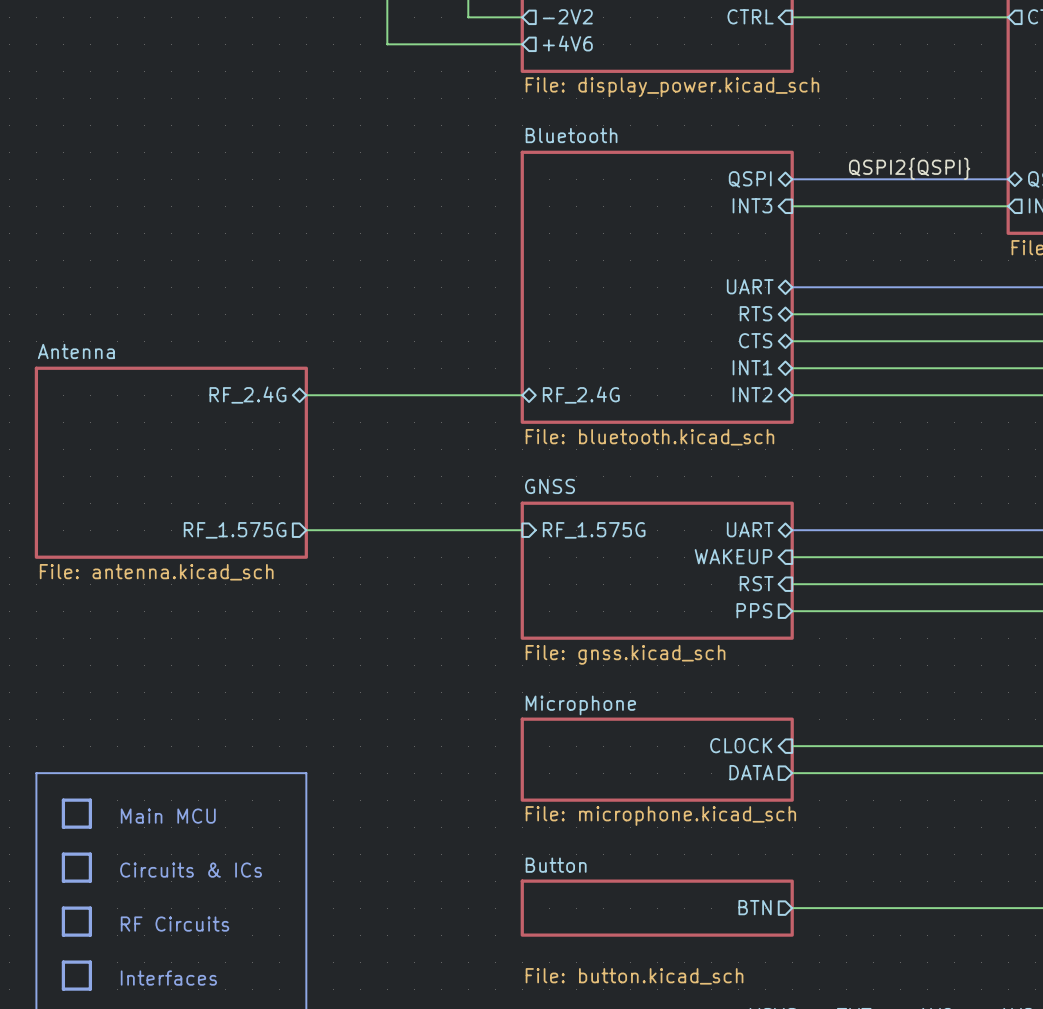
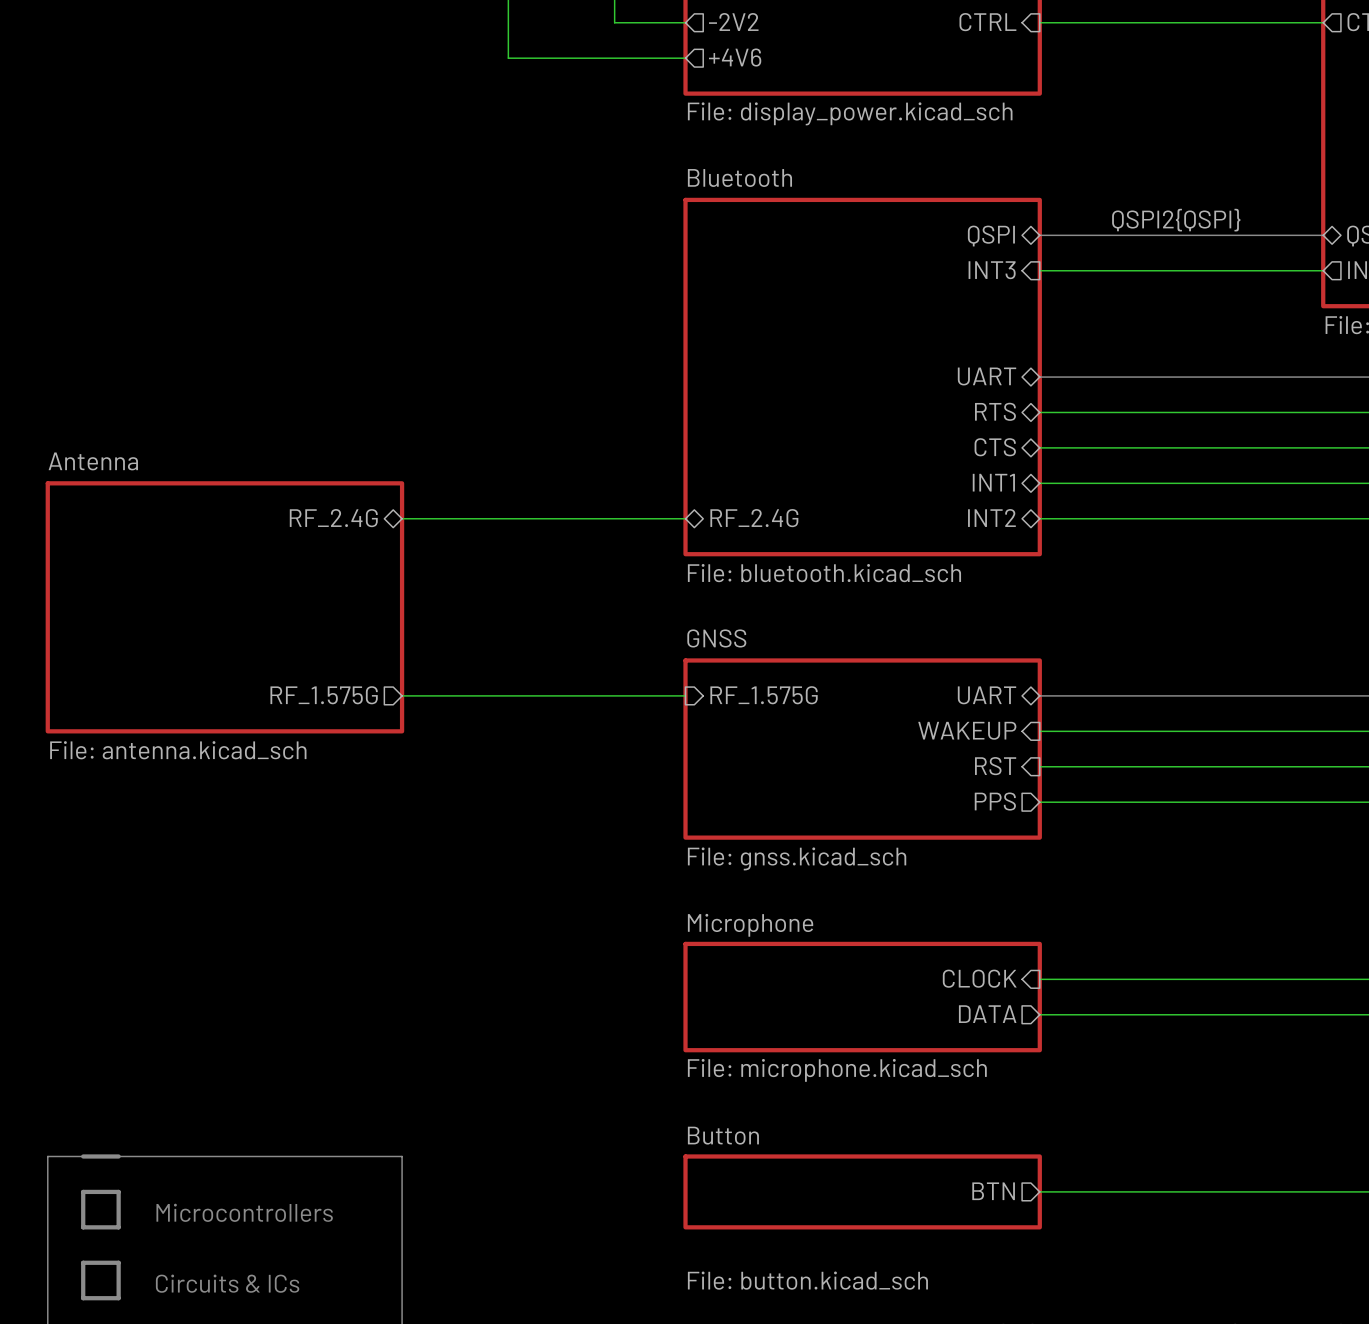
line: (63, 800) (63, 827) (90, 827) (90, 800) (63, 800) -> none
text: Main MCU (168, 816) -> none
text: Circuits & ICs (191, 870) -> none
line: (36, 881) (36, 773) (306, 773) (306, 881) -> (118, 1156) (402, 1156)
line: (63, 881) (63, 854) (90, 854) (90, 881) -> (83, 1156) (47, 1156)
text: RF Circuits (175, 924) -> Microcontrollers (244, 1212)
text: Interfaces (168, 978) -> Circuits & ICs (227, 1283)

